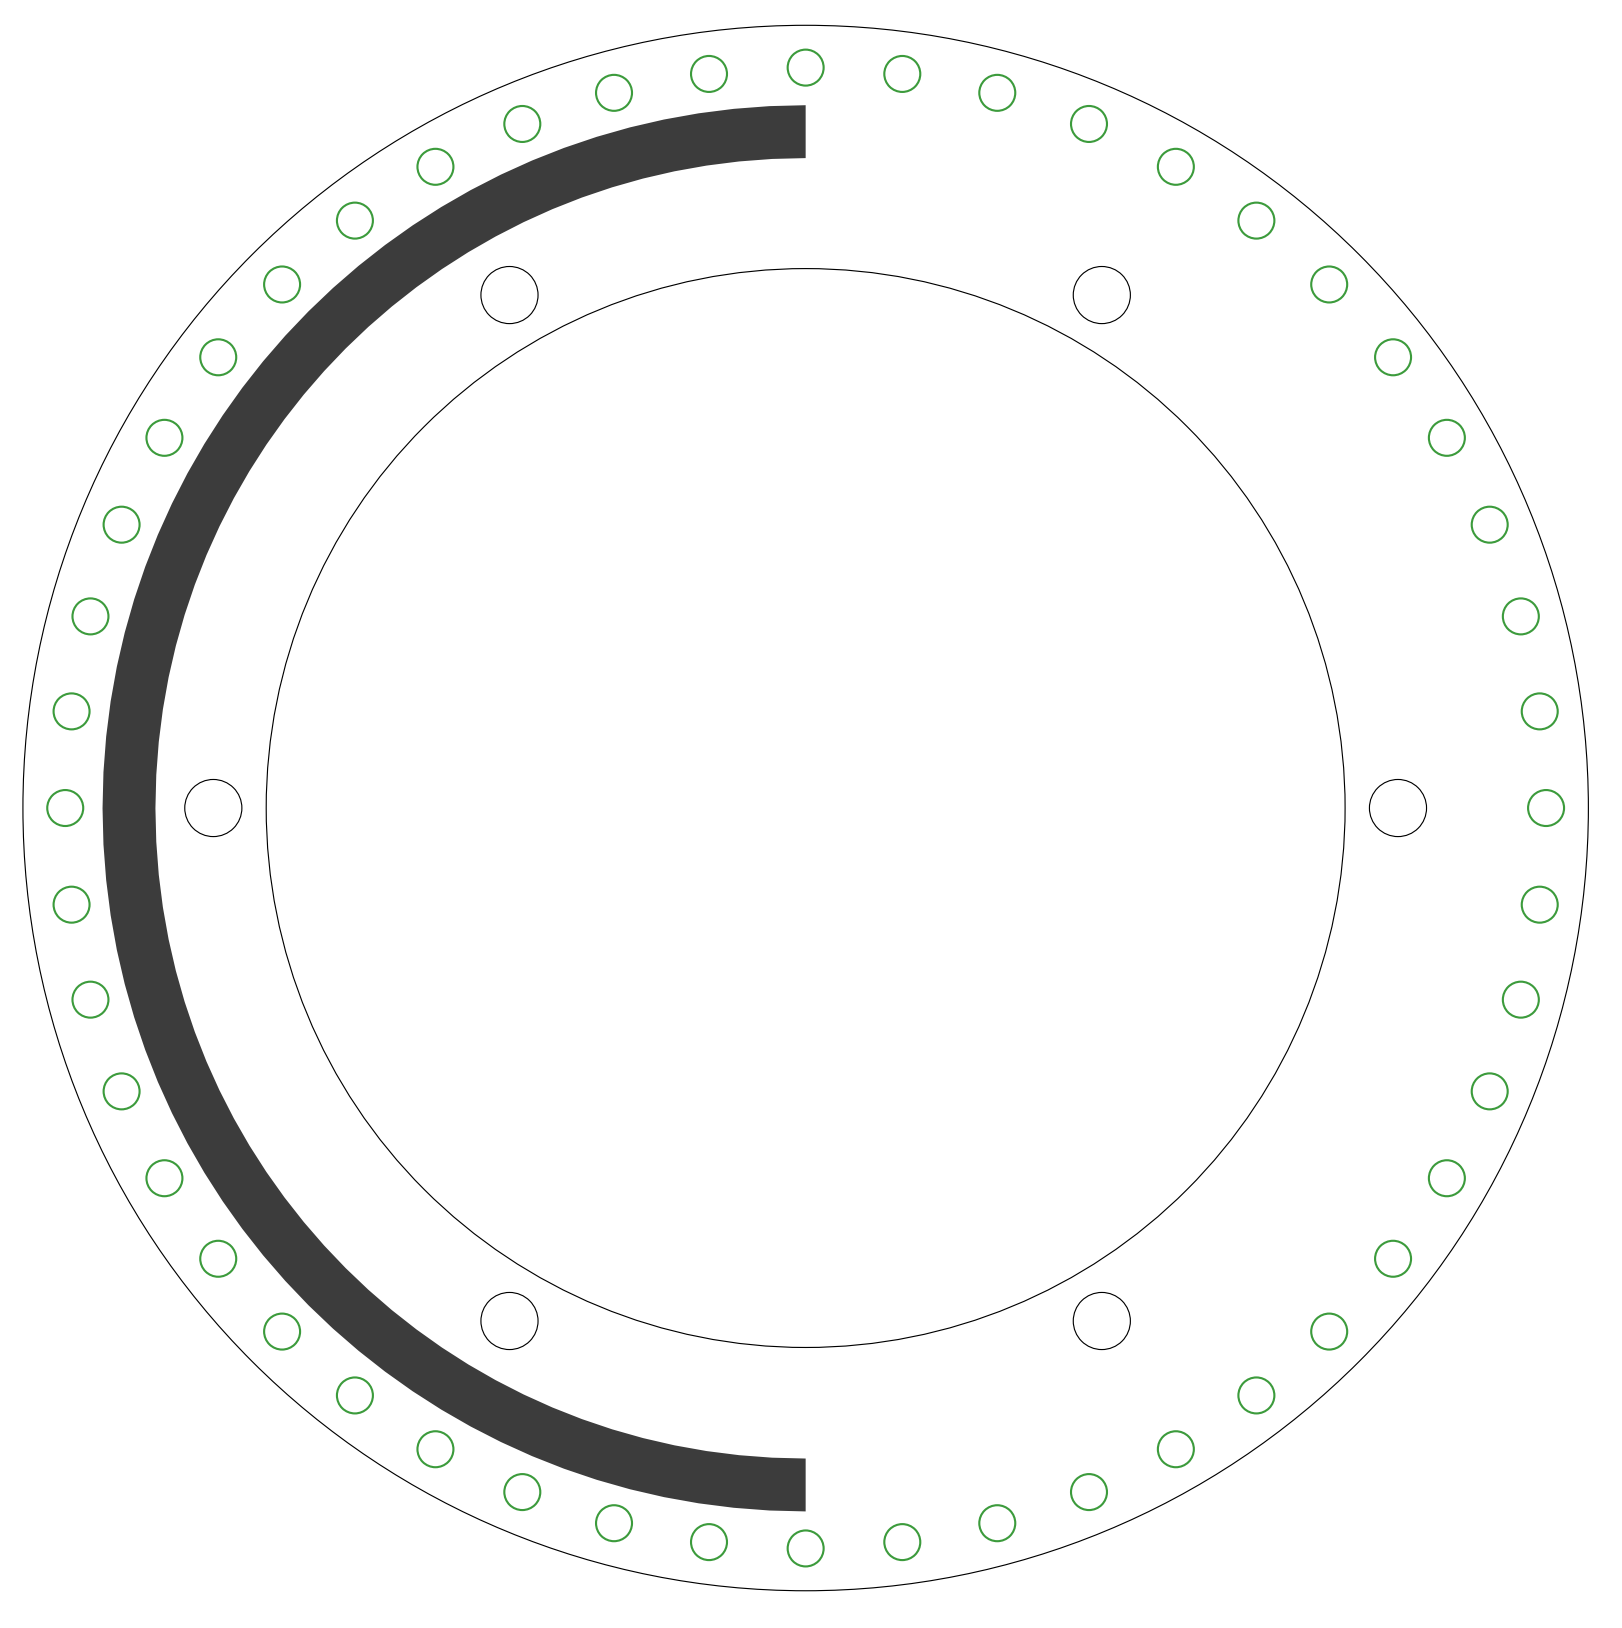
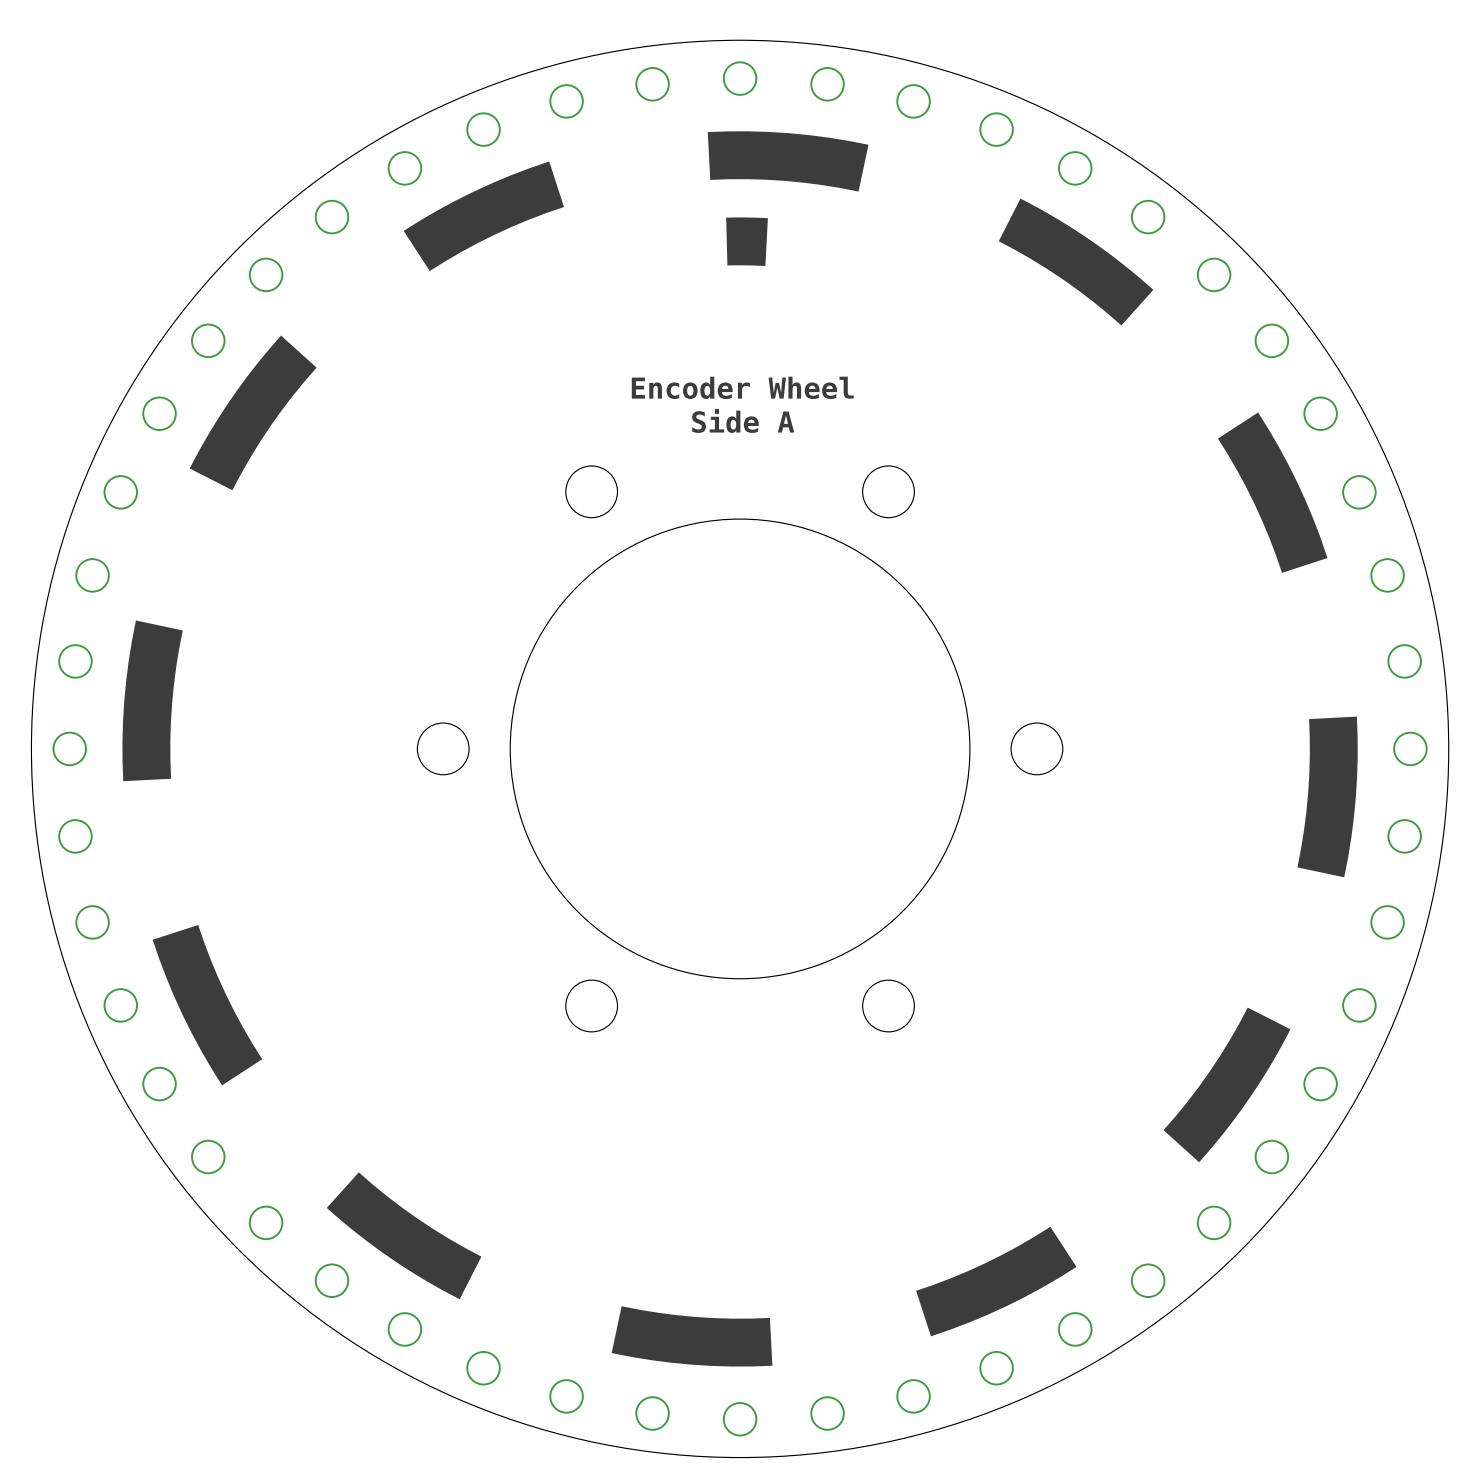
drawing: [102, 105, 806, 1512] -> none
drawing: none -> [122, 131, 1358, 1367]
round board edge: [480, 265, 539, 325] -> none
round board edge: [1072, 265, 1131, 325] -> none
round board edge size: [265, 268, 1346, 1349] -> [509, 518, 971, 980]
text: none -> Encoder Wheel (742, 387)
text: none -> Side A (743, 421)
round board edge: none -> [565, 465, 618, 519]
round board edge: none -> [862, 465, 915, 519]
round board edge: [184, 778, 243, 838] -> none
round board edge: none -> [416, 722, 470, 776]
round board edge: none -> [1010, 722, 1064, 776]
round board edge: [1368, 778, 1428, 838] -> none
round board edge: none -> [565, 979, 618, 1033]
round board edge: none -> [862, 979, 915, 1033]
round board edge: [480, 1291, 539, 1351] -> none
round board edge: [1072, 1291, 1131, 1351] -> none

